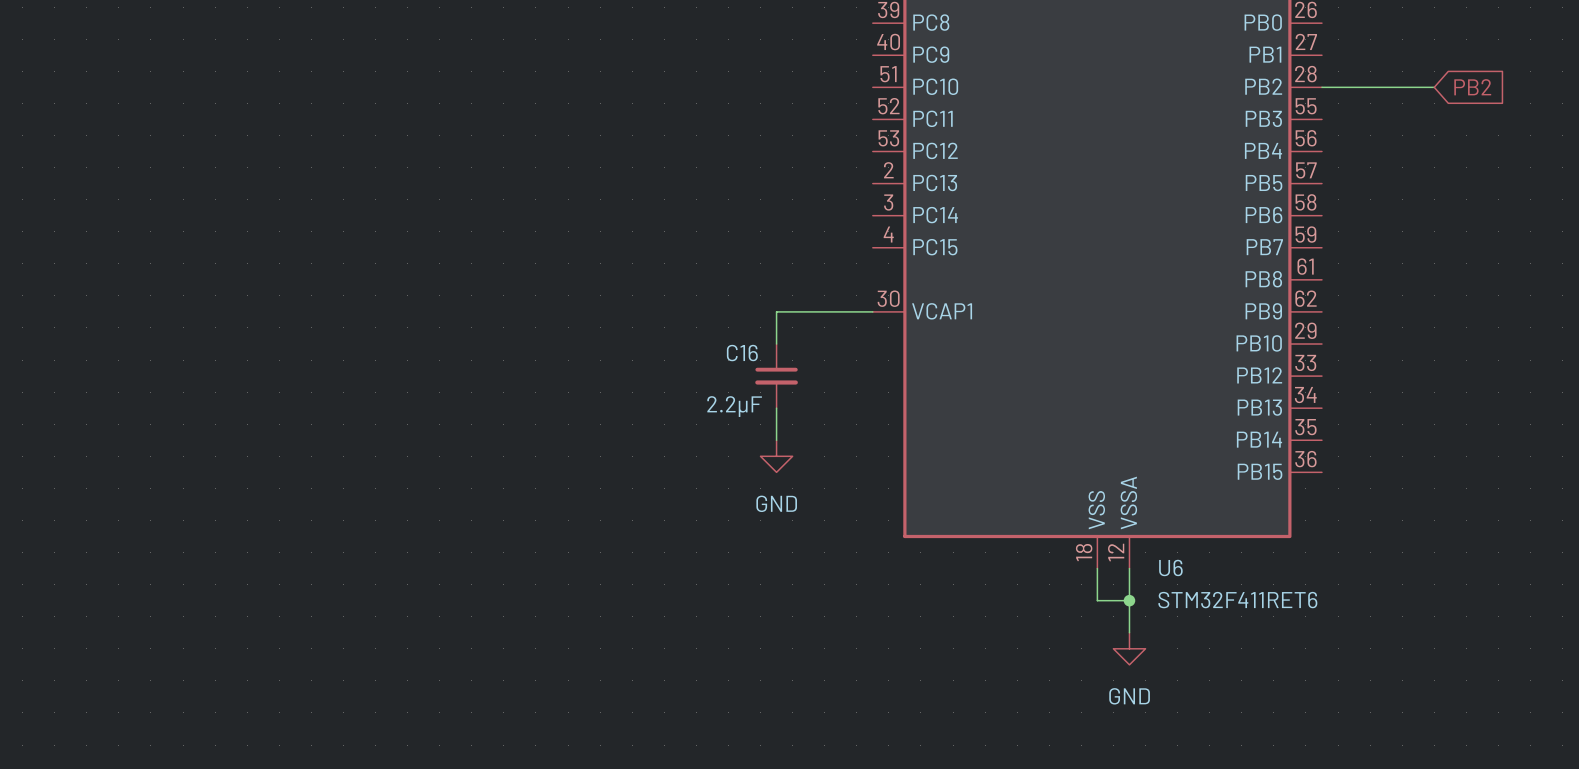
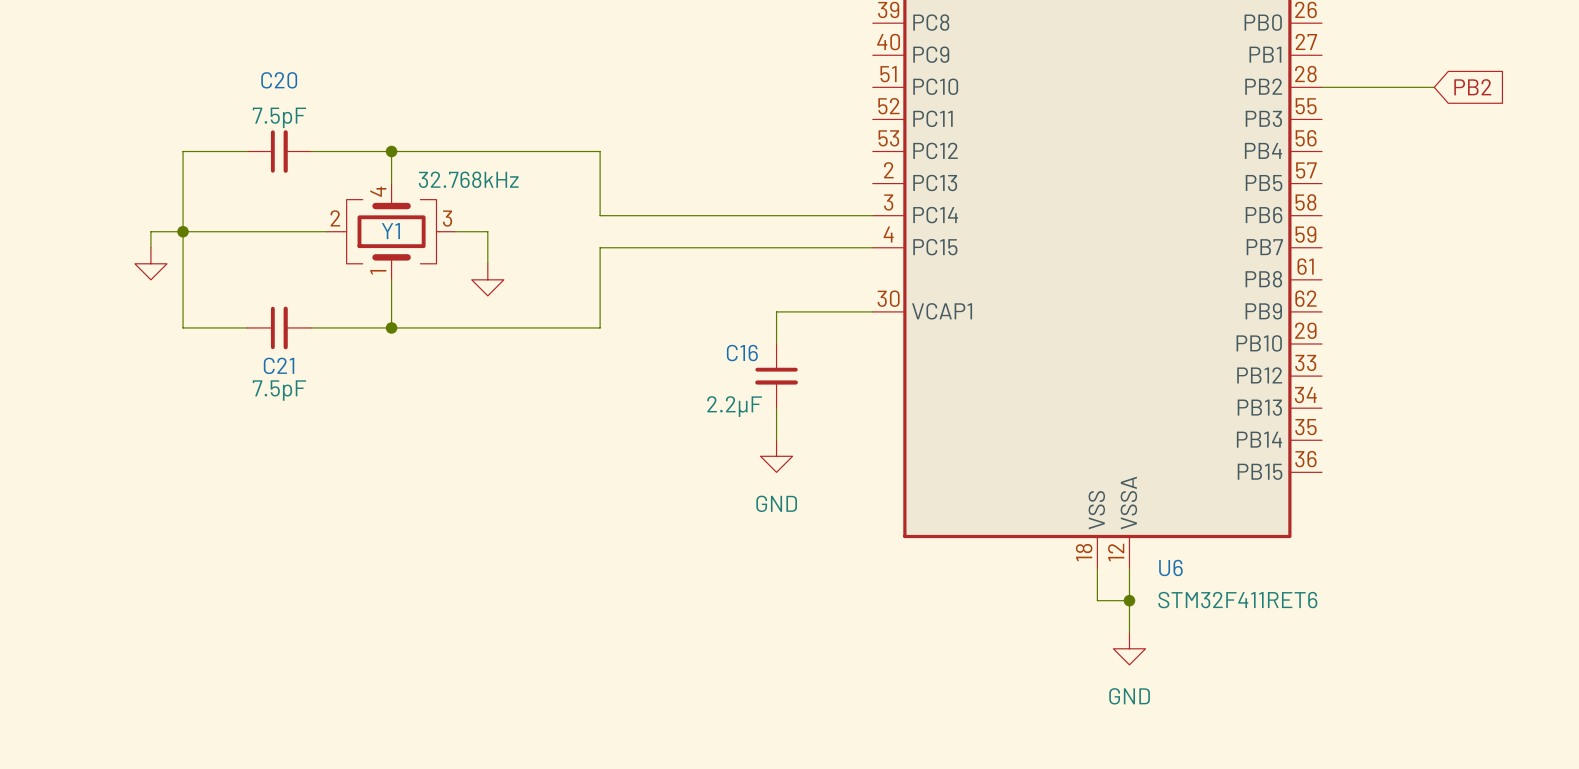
wire: none -> (247, 151) (183, 151) (183, 327) (247, 327)
C20: none -> 7.5pF (279, 151)
wire: none -> (311, 151) (600, 151) (600, 215) (872, 215)
wire: none -> (391, 151) (391, 183)
junction: none -> (391, 151)
junction: none -> (183, 231)
wire: none -> (327, 231) (150, 231) (150, 247)
Y1: none -> 32.768kHz (391, 231)
wire: none -> (455, 231) (487, 231) (487, 263)
wire: none -> (872, 247) (600, 247) (600, 327) (311, 327)
power symbol: none -> (150, 263)
wire: none -> (391, 279) (391, 327)
power symbol: none -> (487, 279)
C21: none -> 7.5pF (279, 327)
junction: none -> (391, 327)

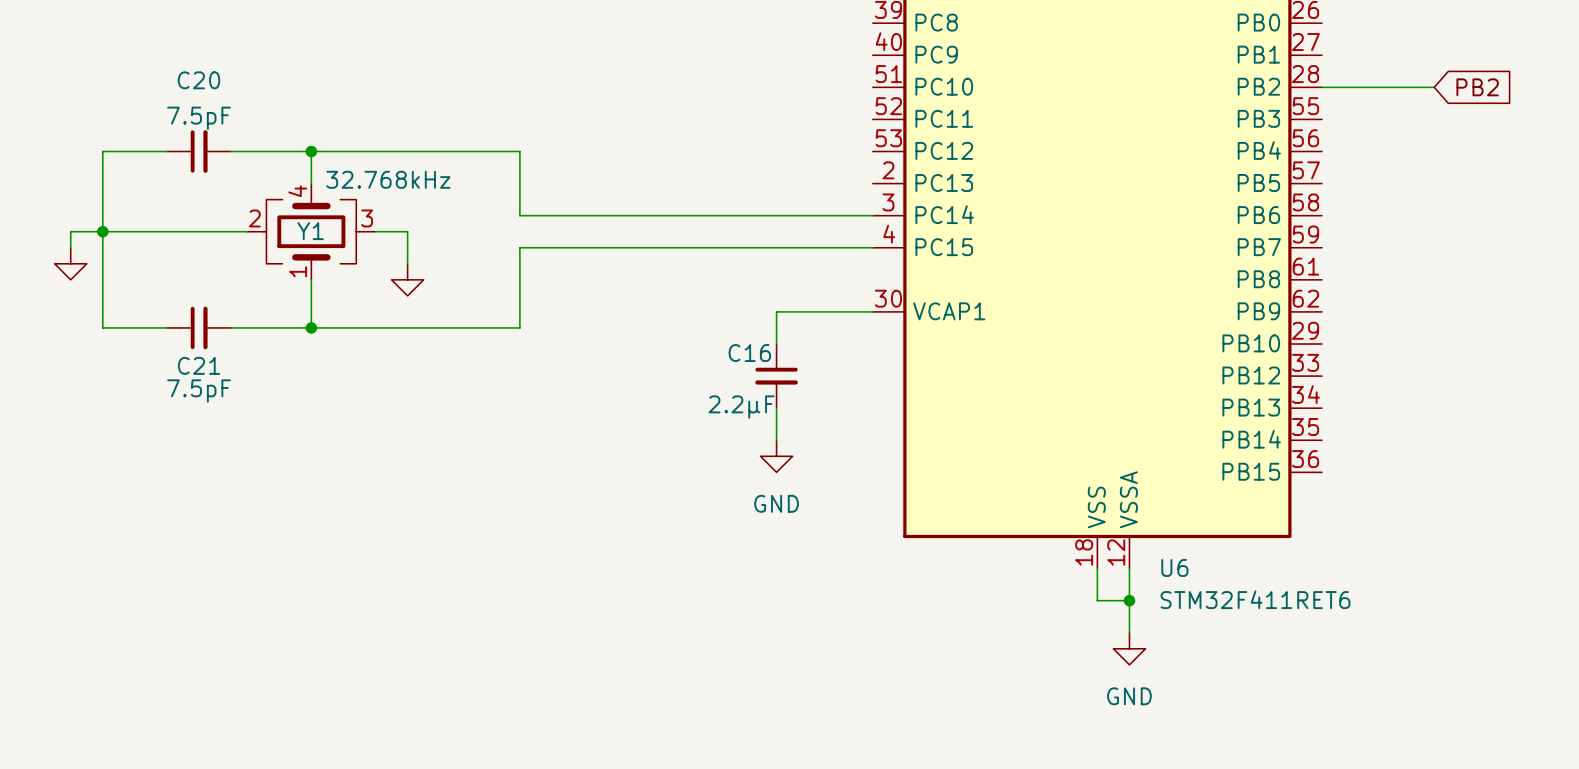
wire: none -> (166, 151) (102, 151) (102, 327) (166, 327)
wire: (231, 151) (183, 151) (183, 327) (231, 327) -> none
wire: none -> (247, 151) (311, 151) (311, 183)
C20 position: (279, 151) -> (199, 151)
junction: none -> (311, 151)
wire: (391, 151) (391, 183) -> none
junction: (391, 151) -> none
wire: (519, 151) (600, 151) (600, 215) -> (519, 151) (519, 215) (600, 215)
junction: none -> (102, 231)
wire: (150, 231) (150, 247) -> (150, 231) (70, 231) (70, 247)
junction: (183, 231) -> none
wire: (247, 231) (327, 231) -> none
Y1 position: (391, 231) -> (311, 231)
wire: (455, 231) (487, 231) (487, 263) -> (375, 231) (407, 231) (407, 263)
wire: (600, 247) (600, 327) (519, 327) -> (600, 247) (519, 247) (519, 327)
power symbol position: (150, 263) -> (70, 263)
wire: none -> (311, 279) (311, 327) (247, 327)
wire: (391, 279) (391, 327) -> none
power symbol position: (487, 279) -> (407, 279)
C21 position: (279, 327) -> (199, 327)
junction: none -> (311, 327)
junction: (391, 327) -> none

